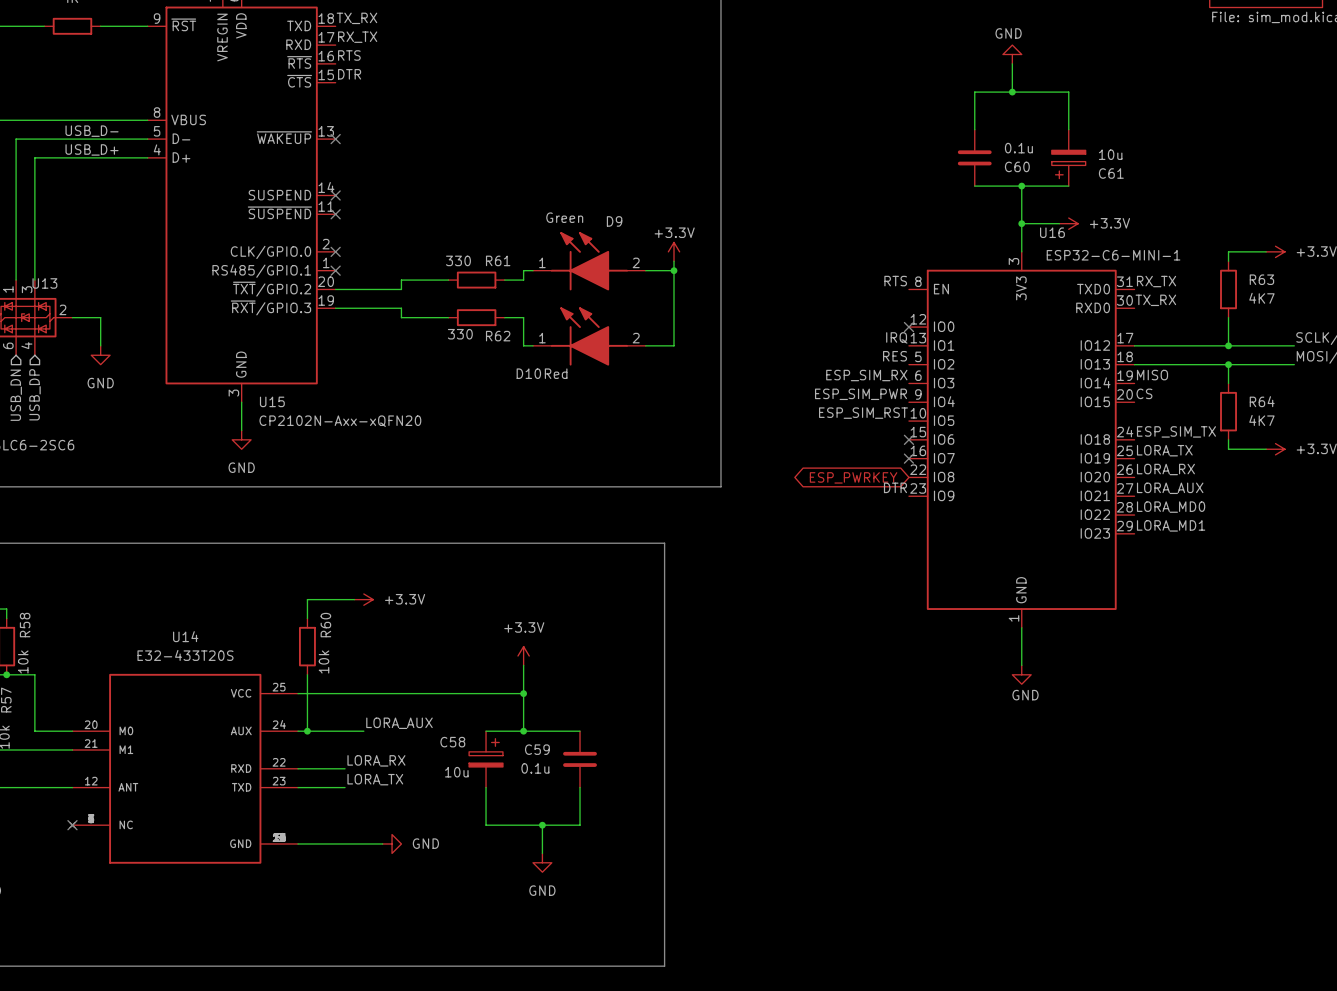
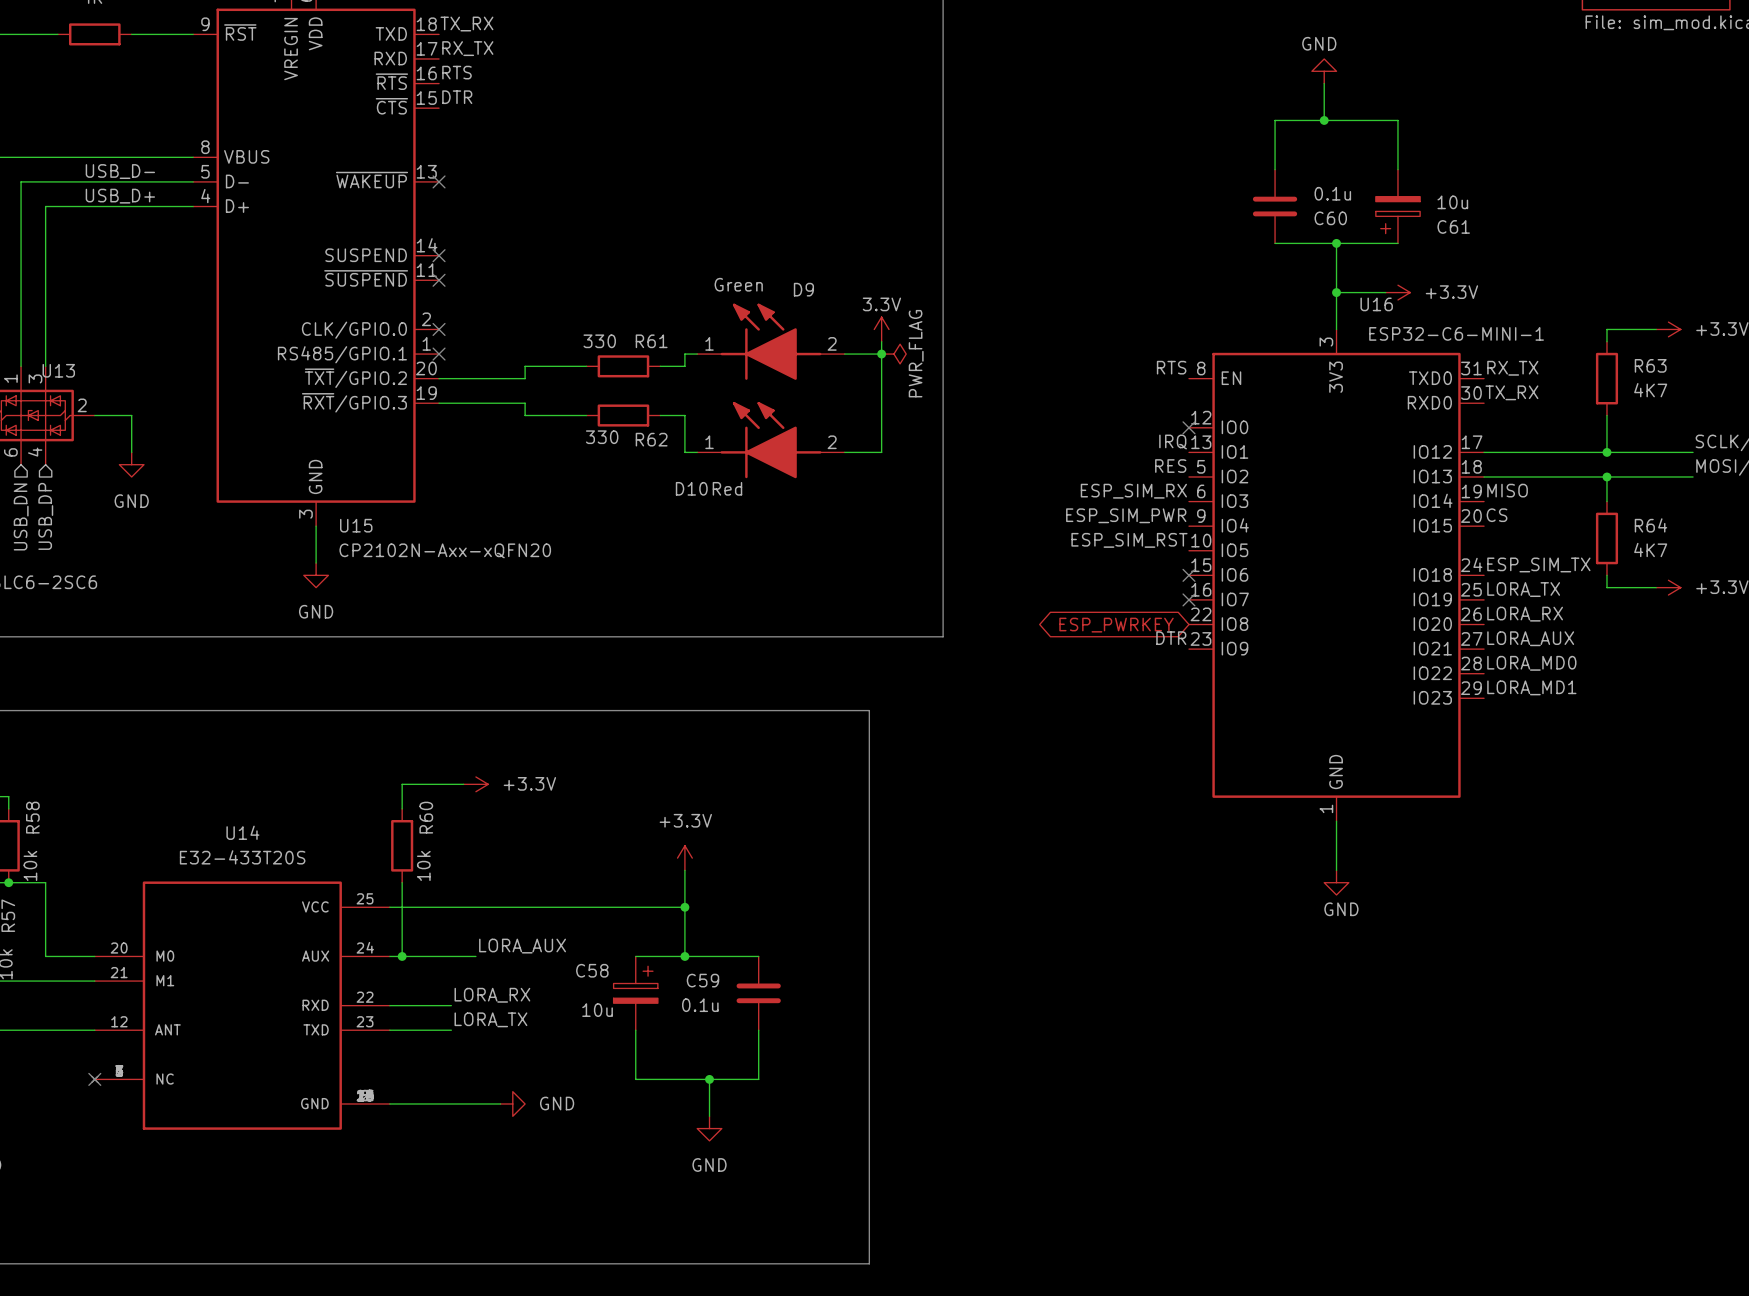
power symbol: +3.3V (673, 251) -> 3.3V (881, 329)
power symbol: none -> PWR_FLAG (893, 354)

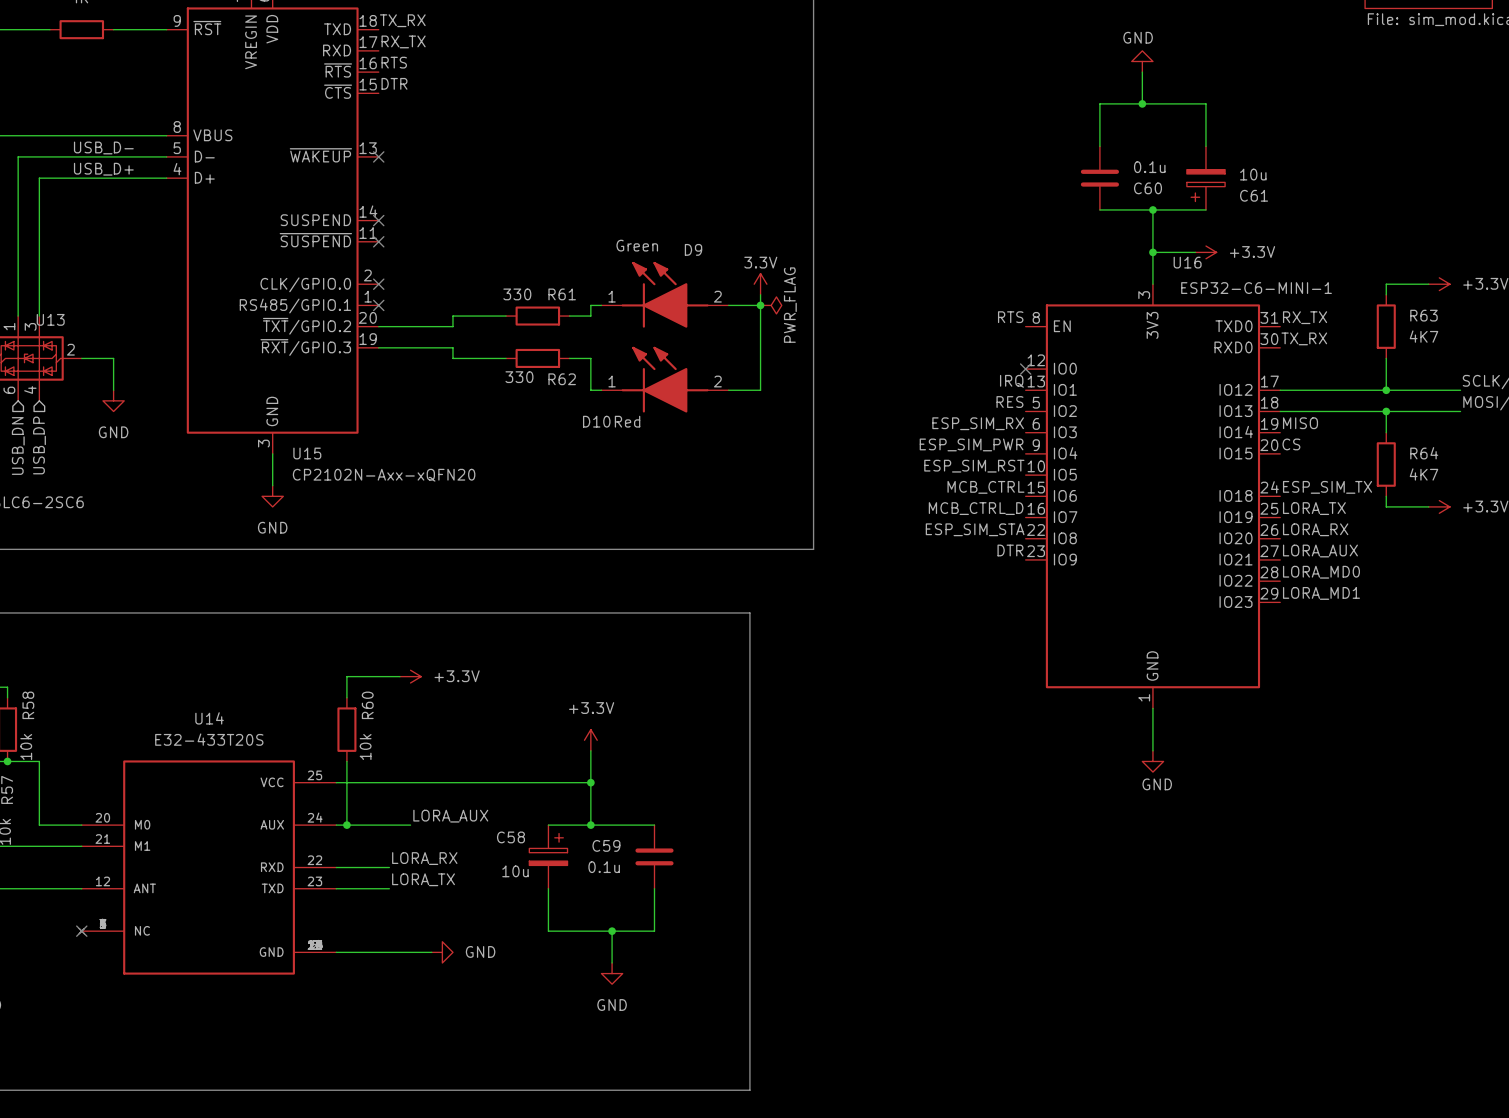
label: none -> MCB_CTRL (985, 487)
no-connect mark: (1188, 575) -> none
label: none -> MCB_CTRL_D (976, 508)
no-connect mark: (1188, 599) -> none
label: none -> ESP_SIM_STA (975, 529)
global label: ESP_PWRKEY (1116, 625) -> none

